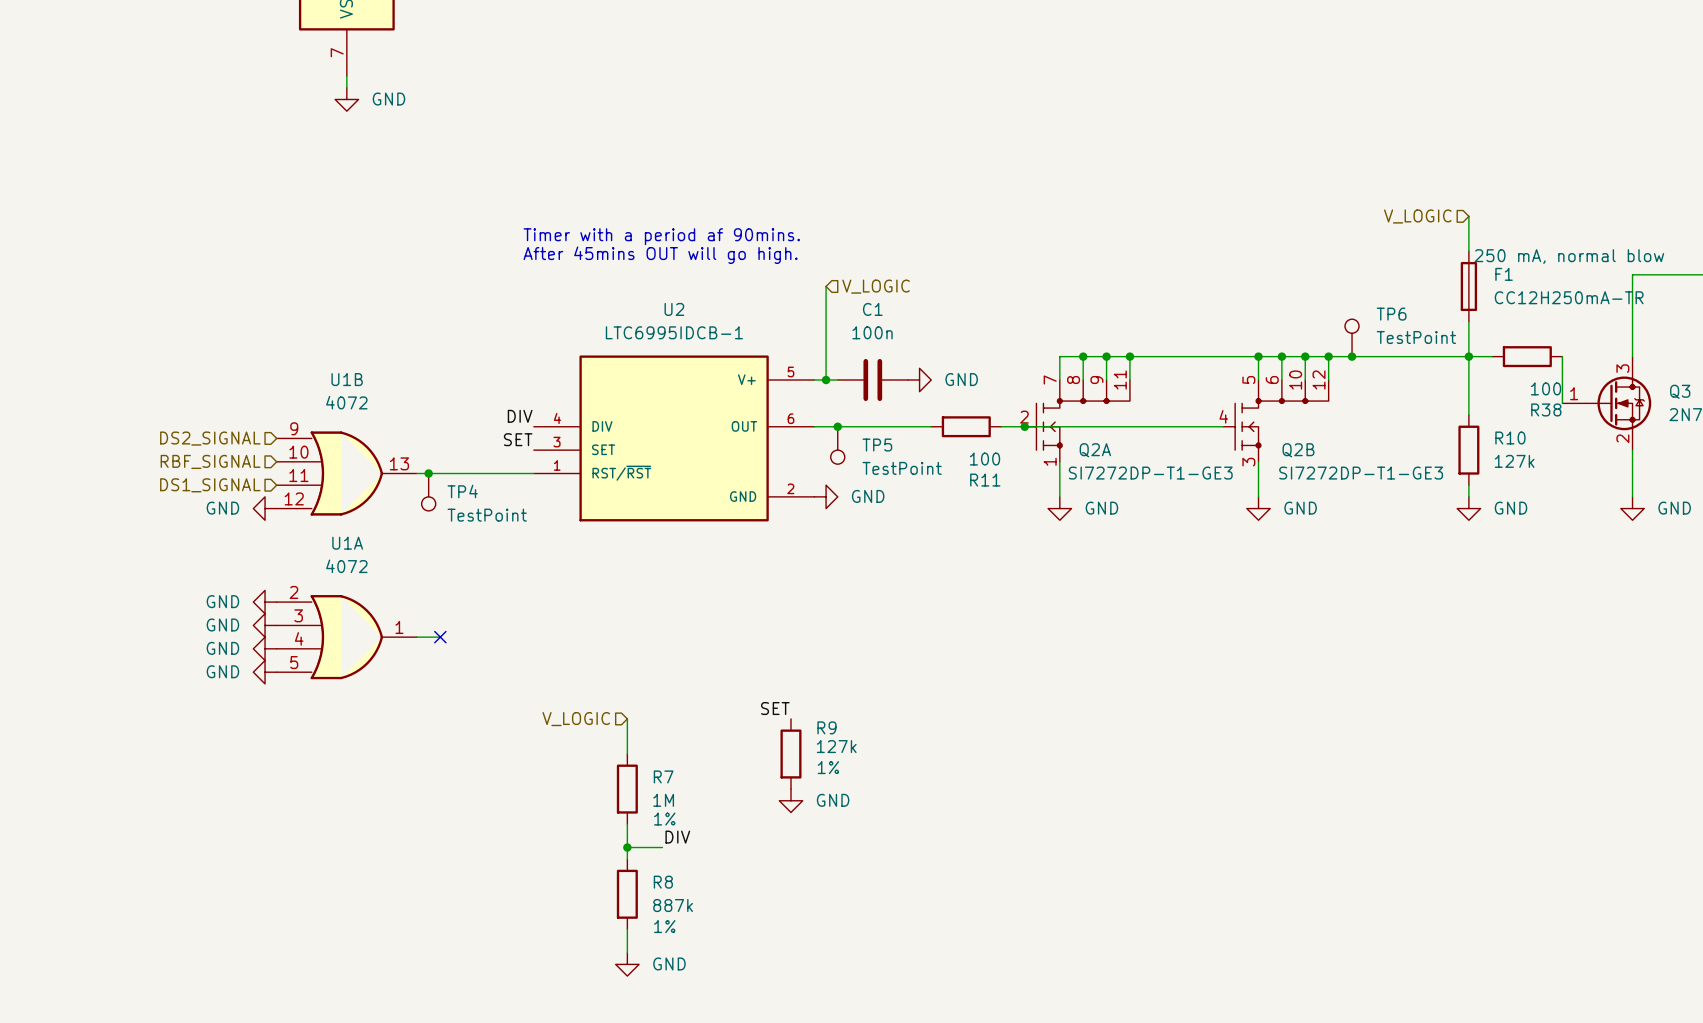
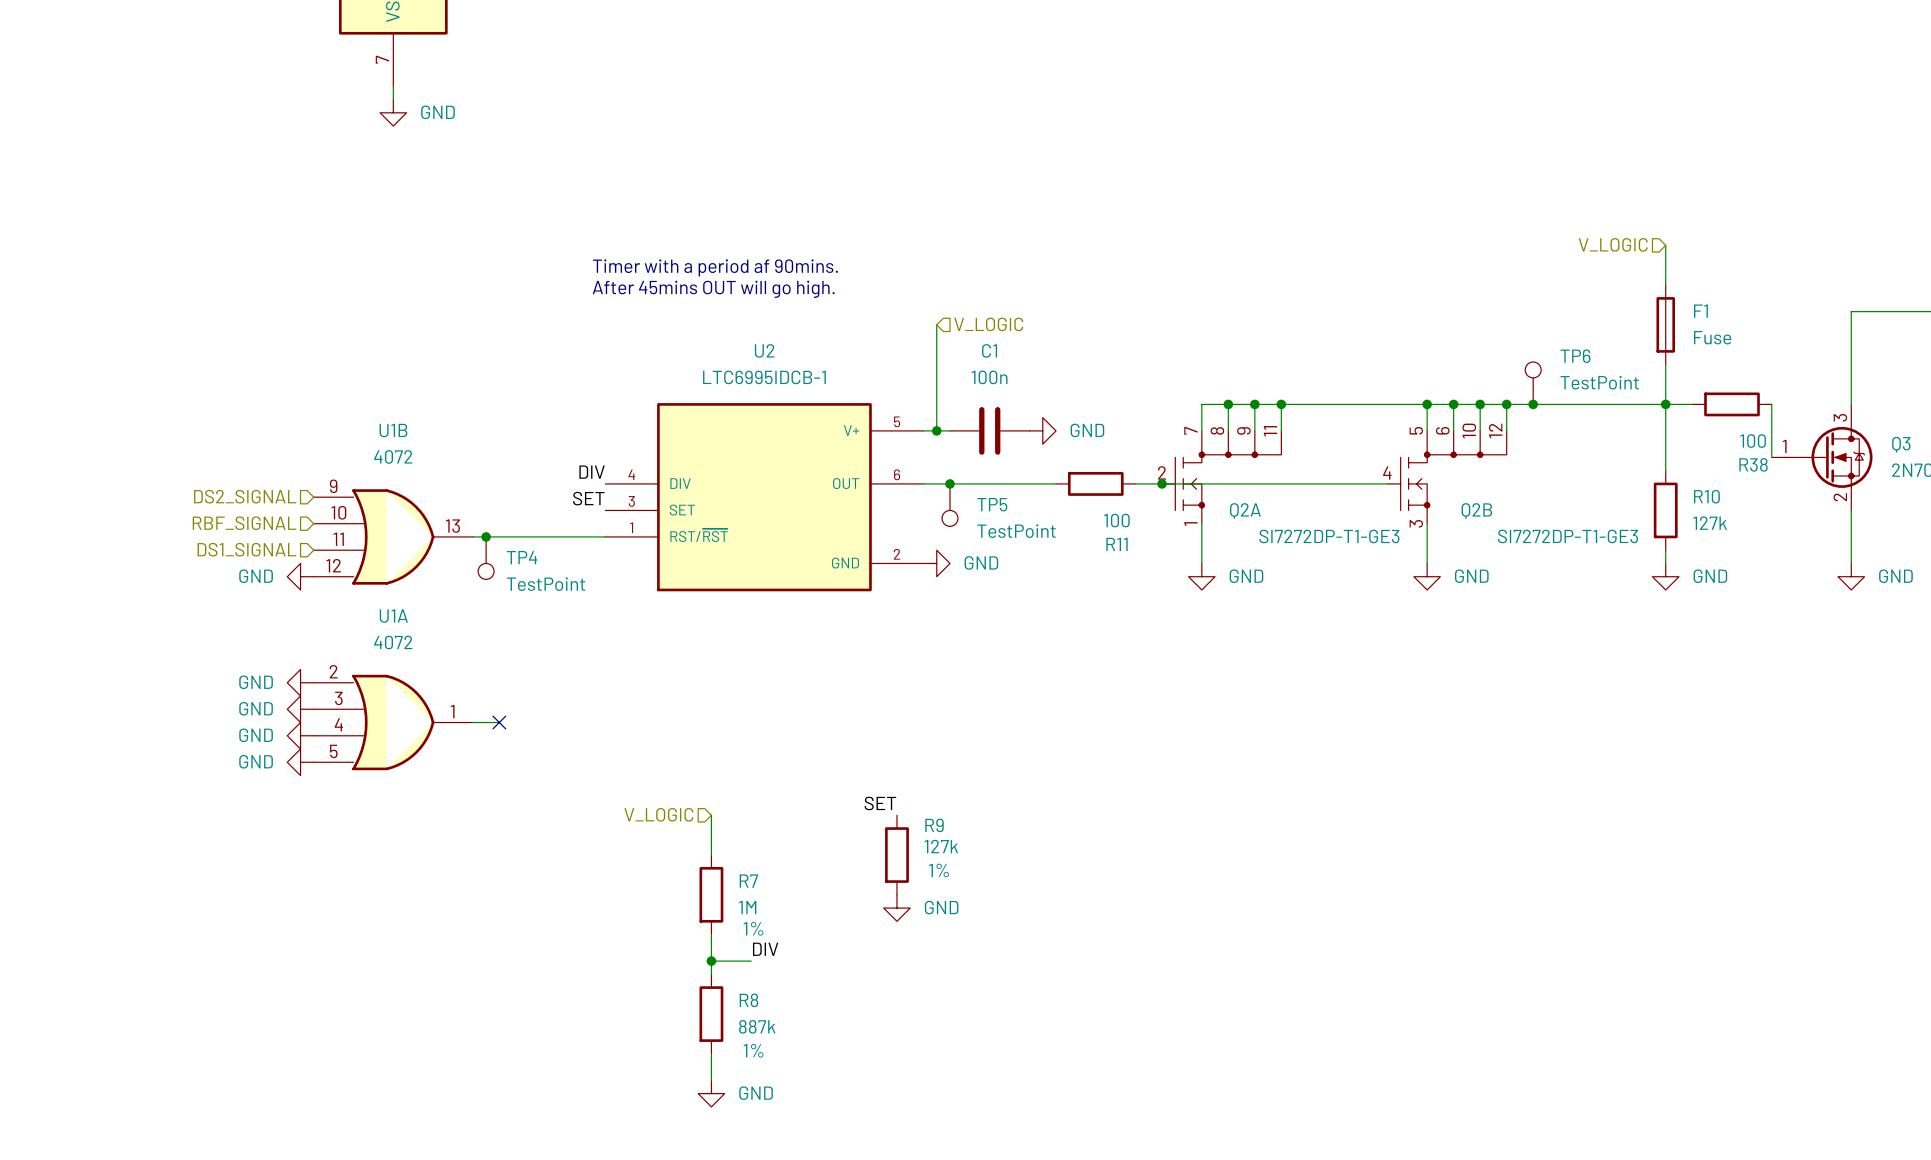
F1 text: 250 mA, normal blow (1569, 256) -> none
F1 value: CC12H250mA-TR (1569, 297) -> Fuse (1712, 337)

